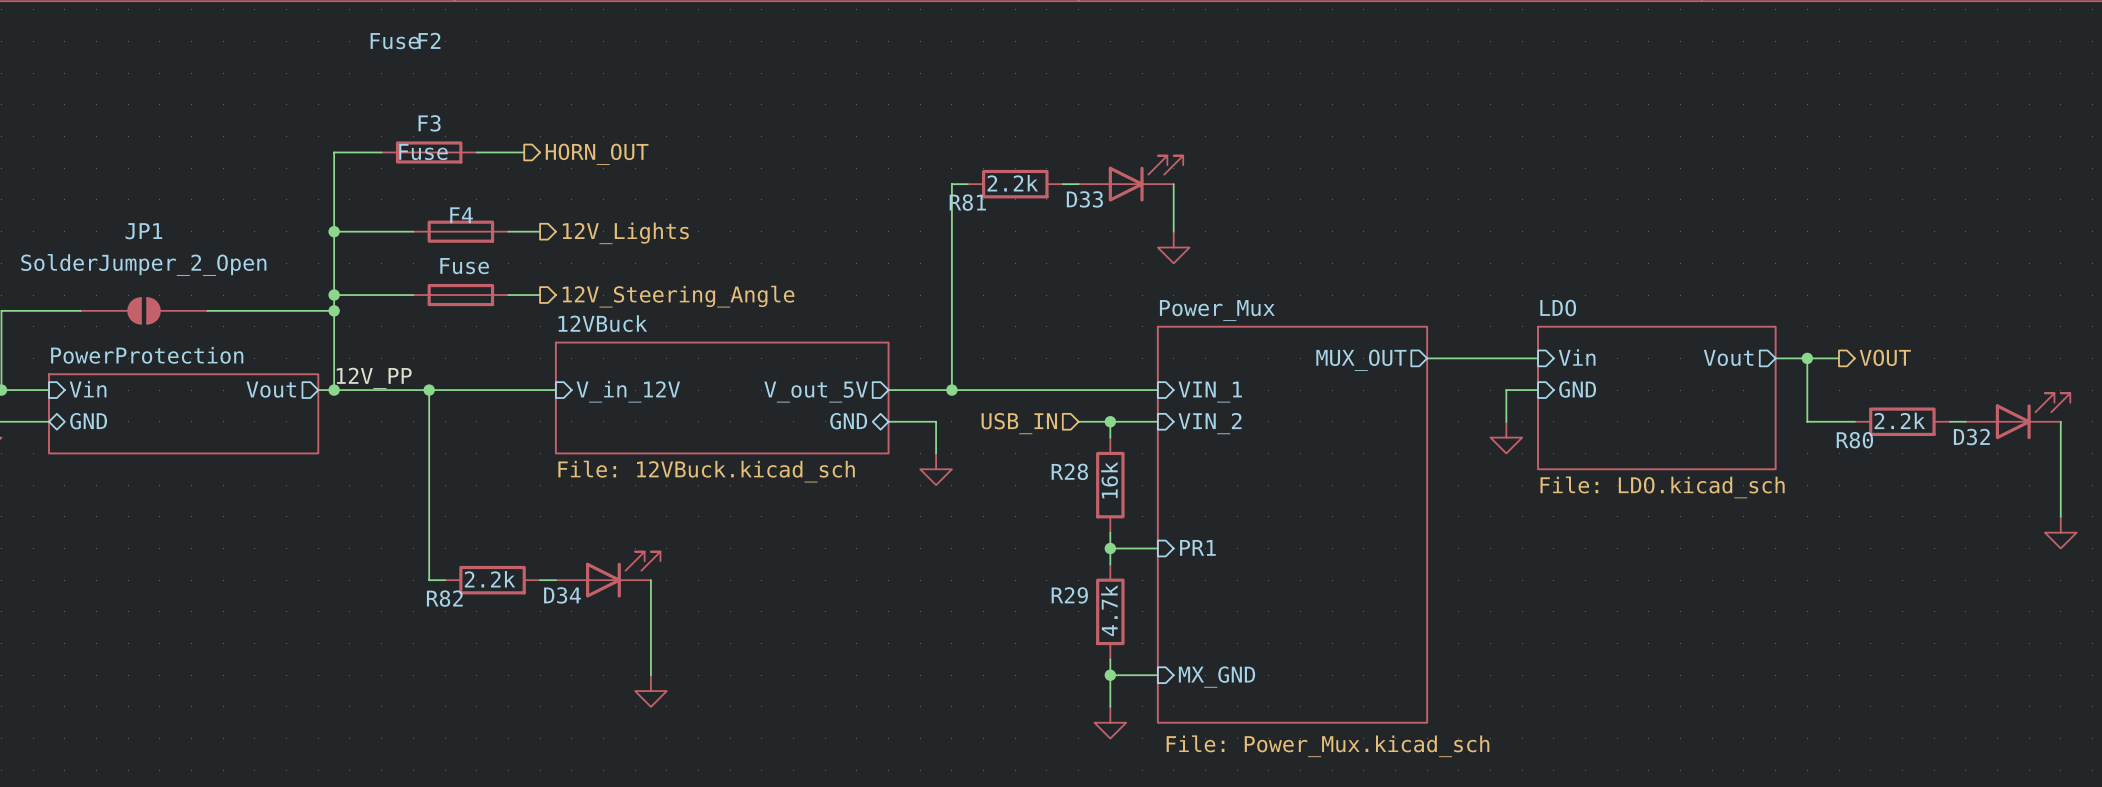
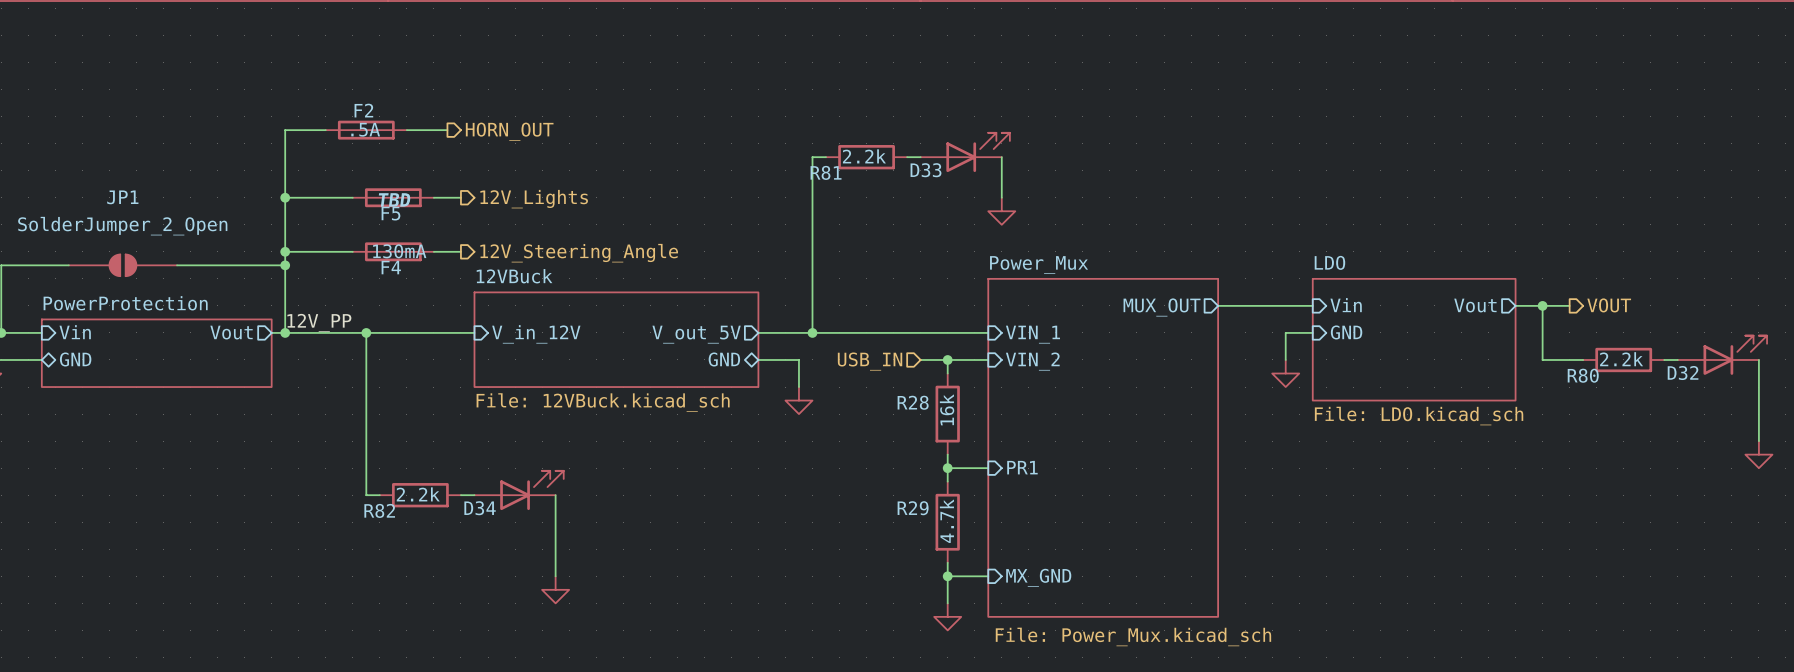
F2 name position: F2 (429, 40) -> F2 (363, 110)
F2 value: Fuse (394, 41) -> .5A (365, 129)
F3 name: F3 (429, 123) -> F5 (390, 213)
F3 value: Fuse (423, 152) -> TBD (394, 199)
F4 name position: F4 (461, 215) -> F4 (391, 267)
F4 value: Fuse (464, 266) -> 130mA (399, 251)

